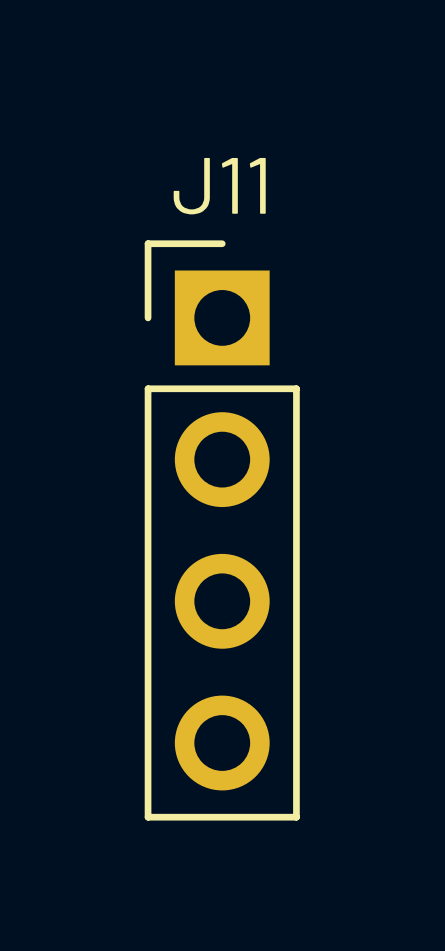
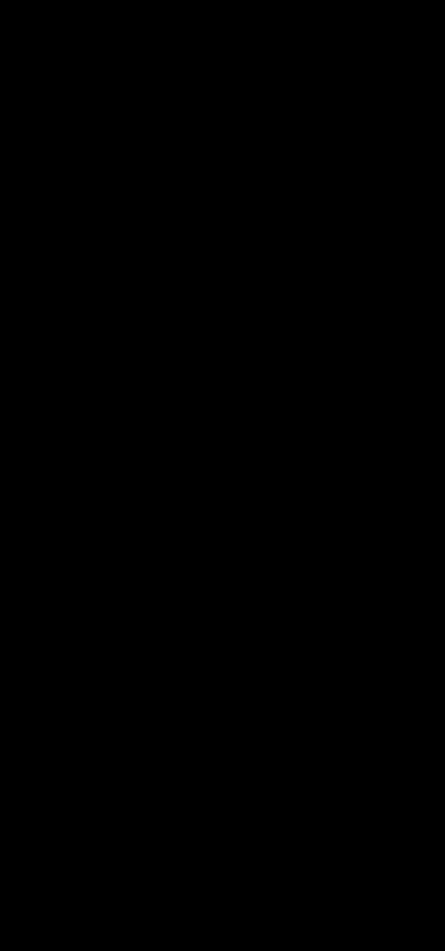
J11: (222, 530) -> none

